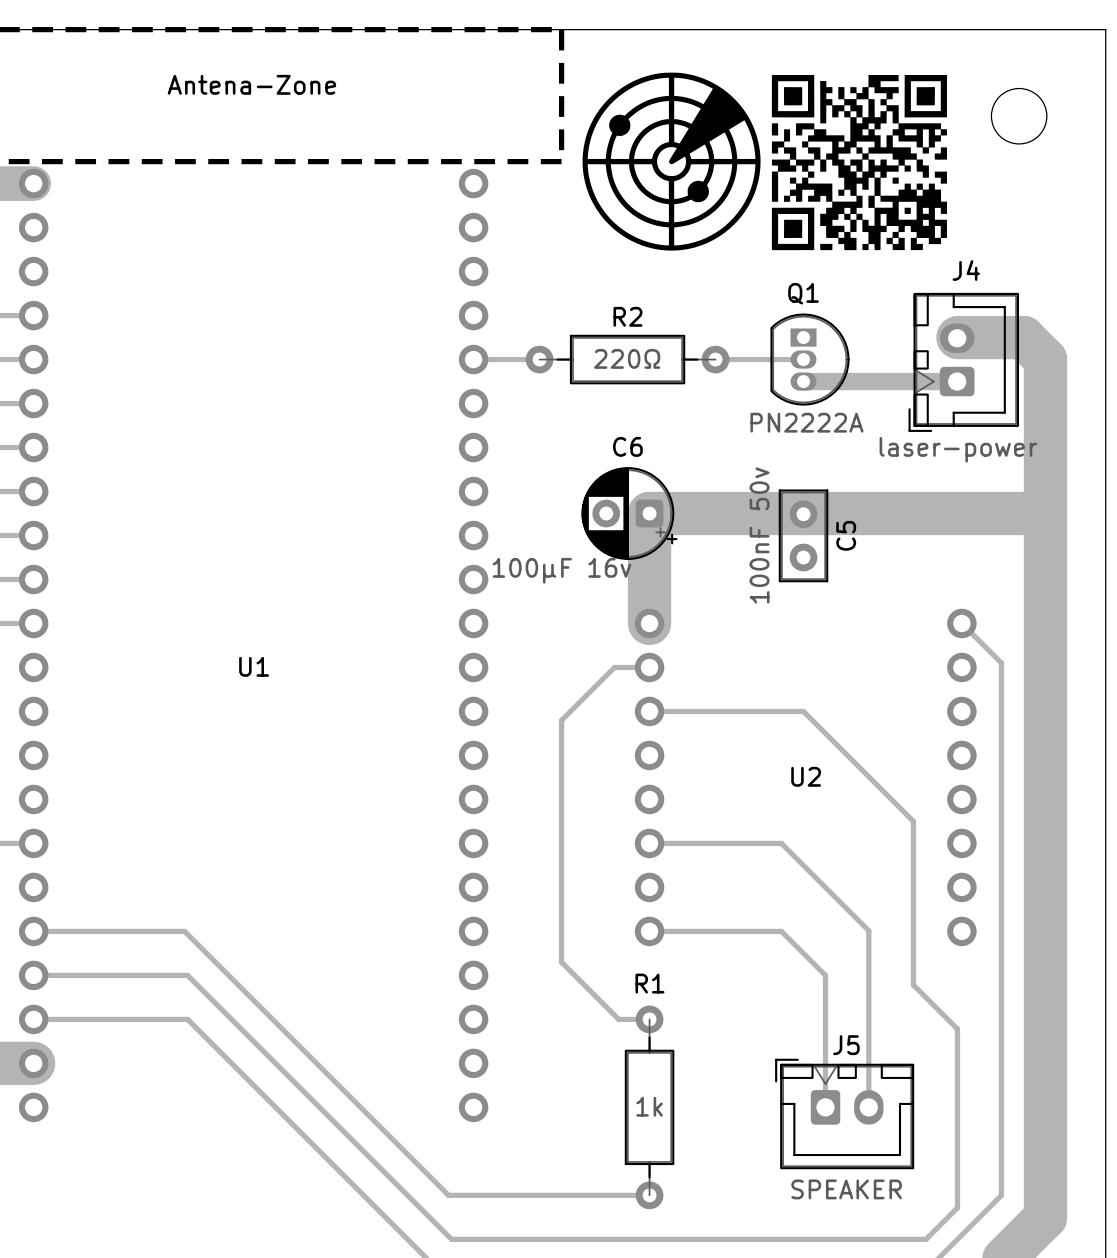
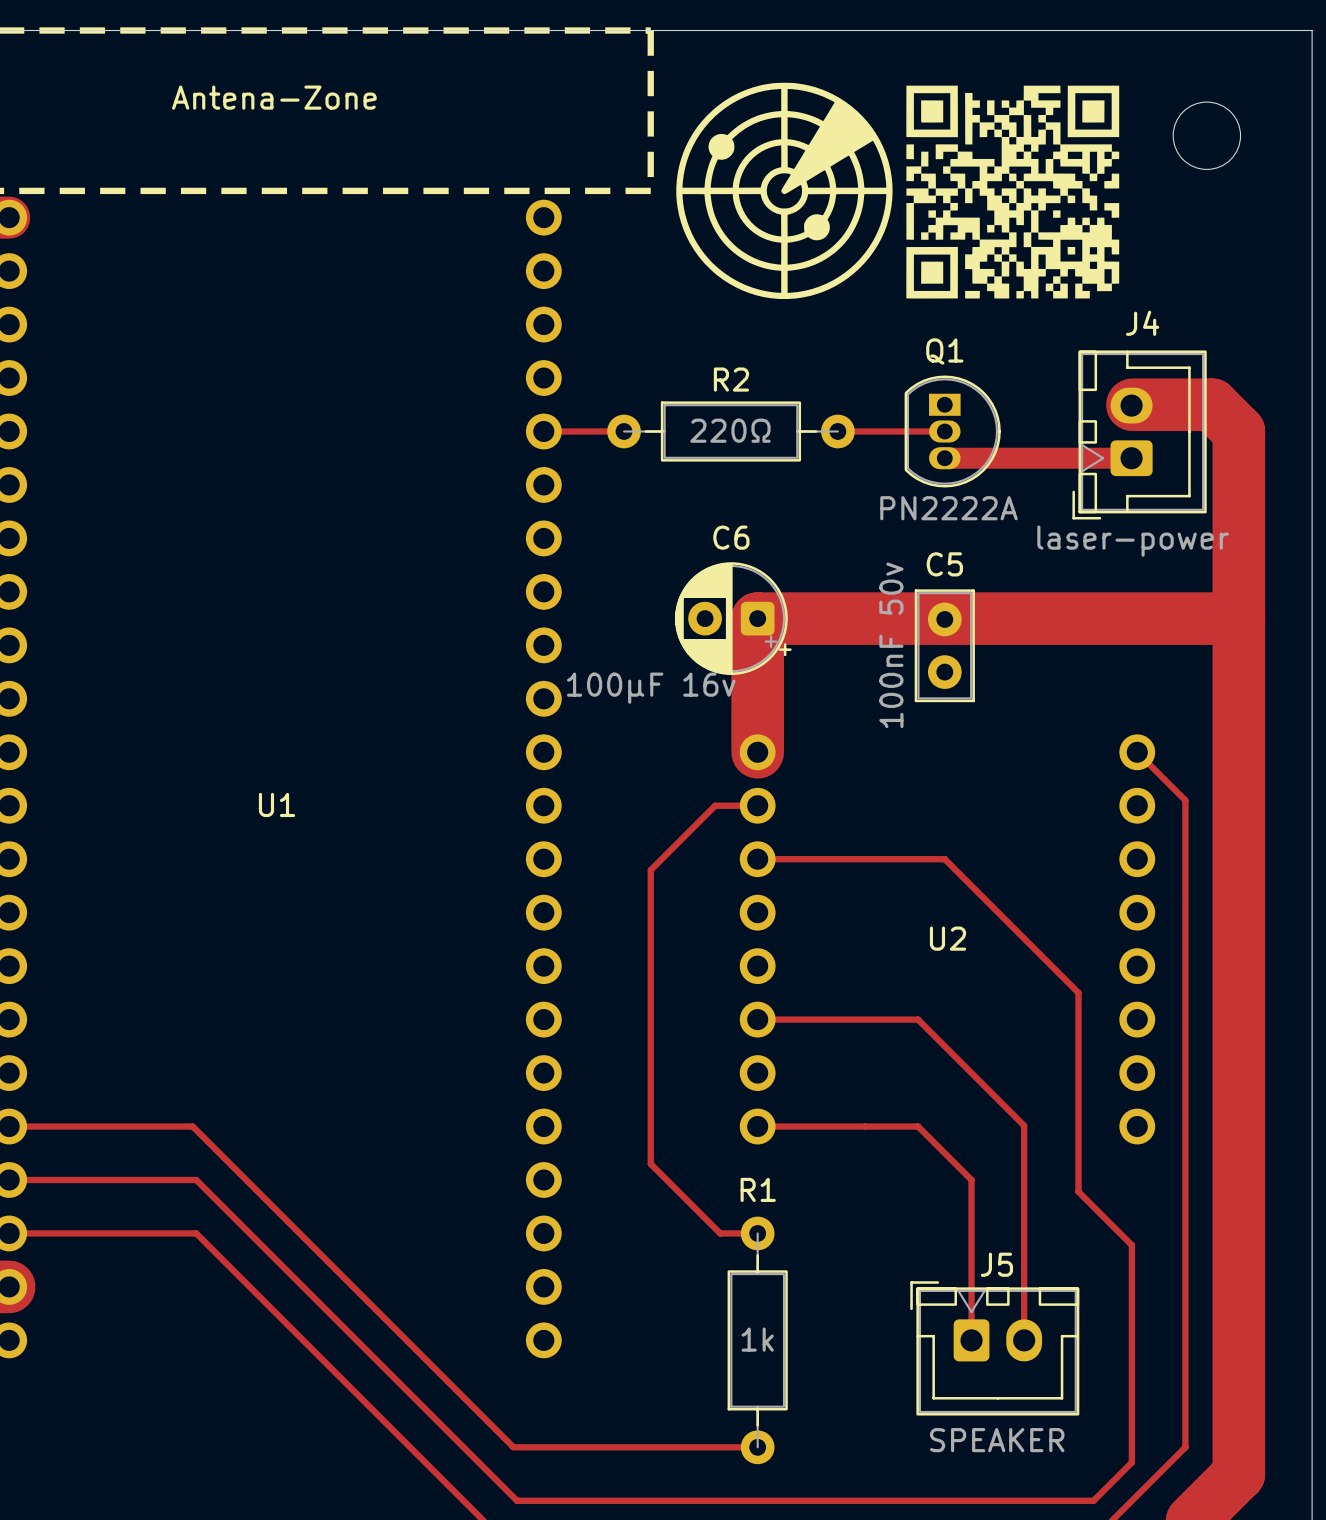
C5 name rotation: 0° (846, 535) -> 90° clockwise (944, 564)
C5 name position: C5 (846, 535) -> C5 (944, 564)

